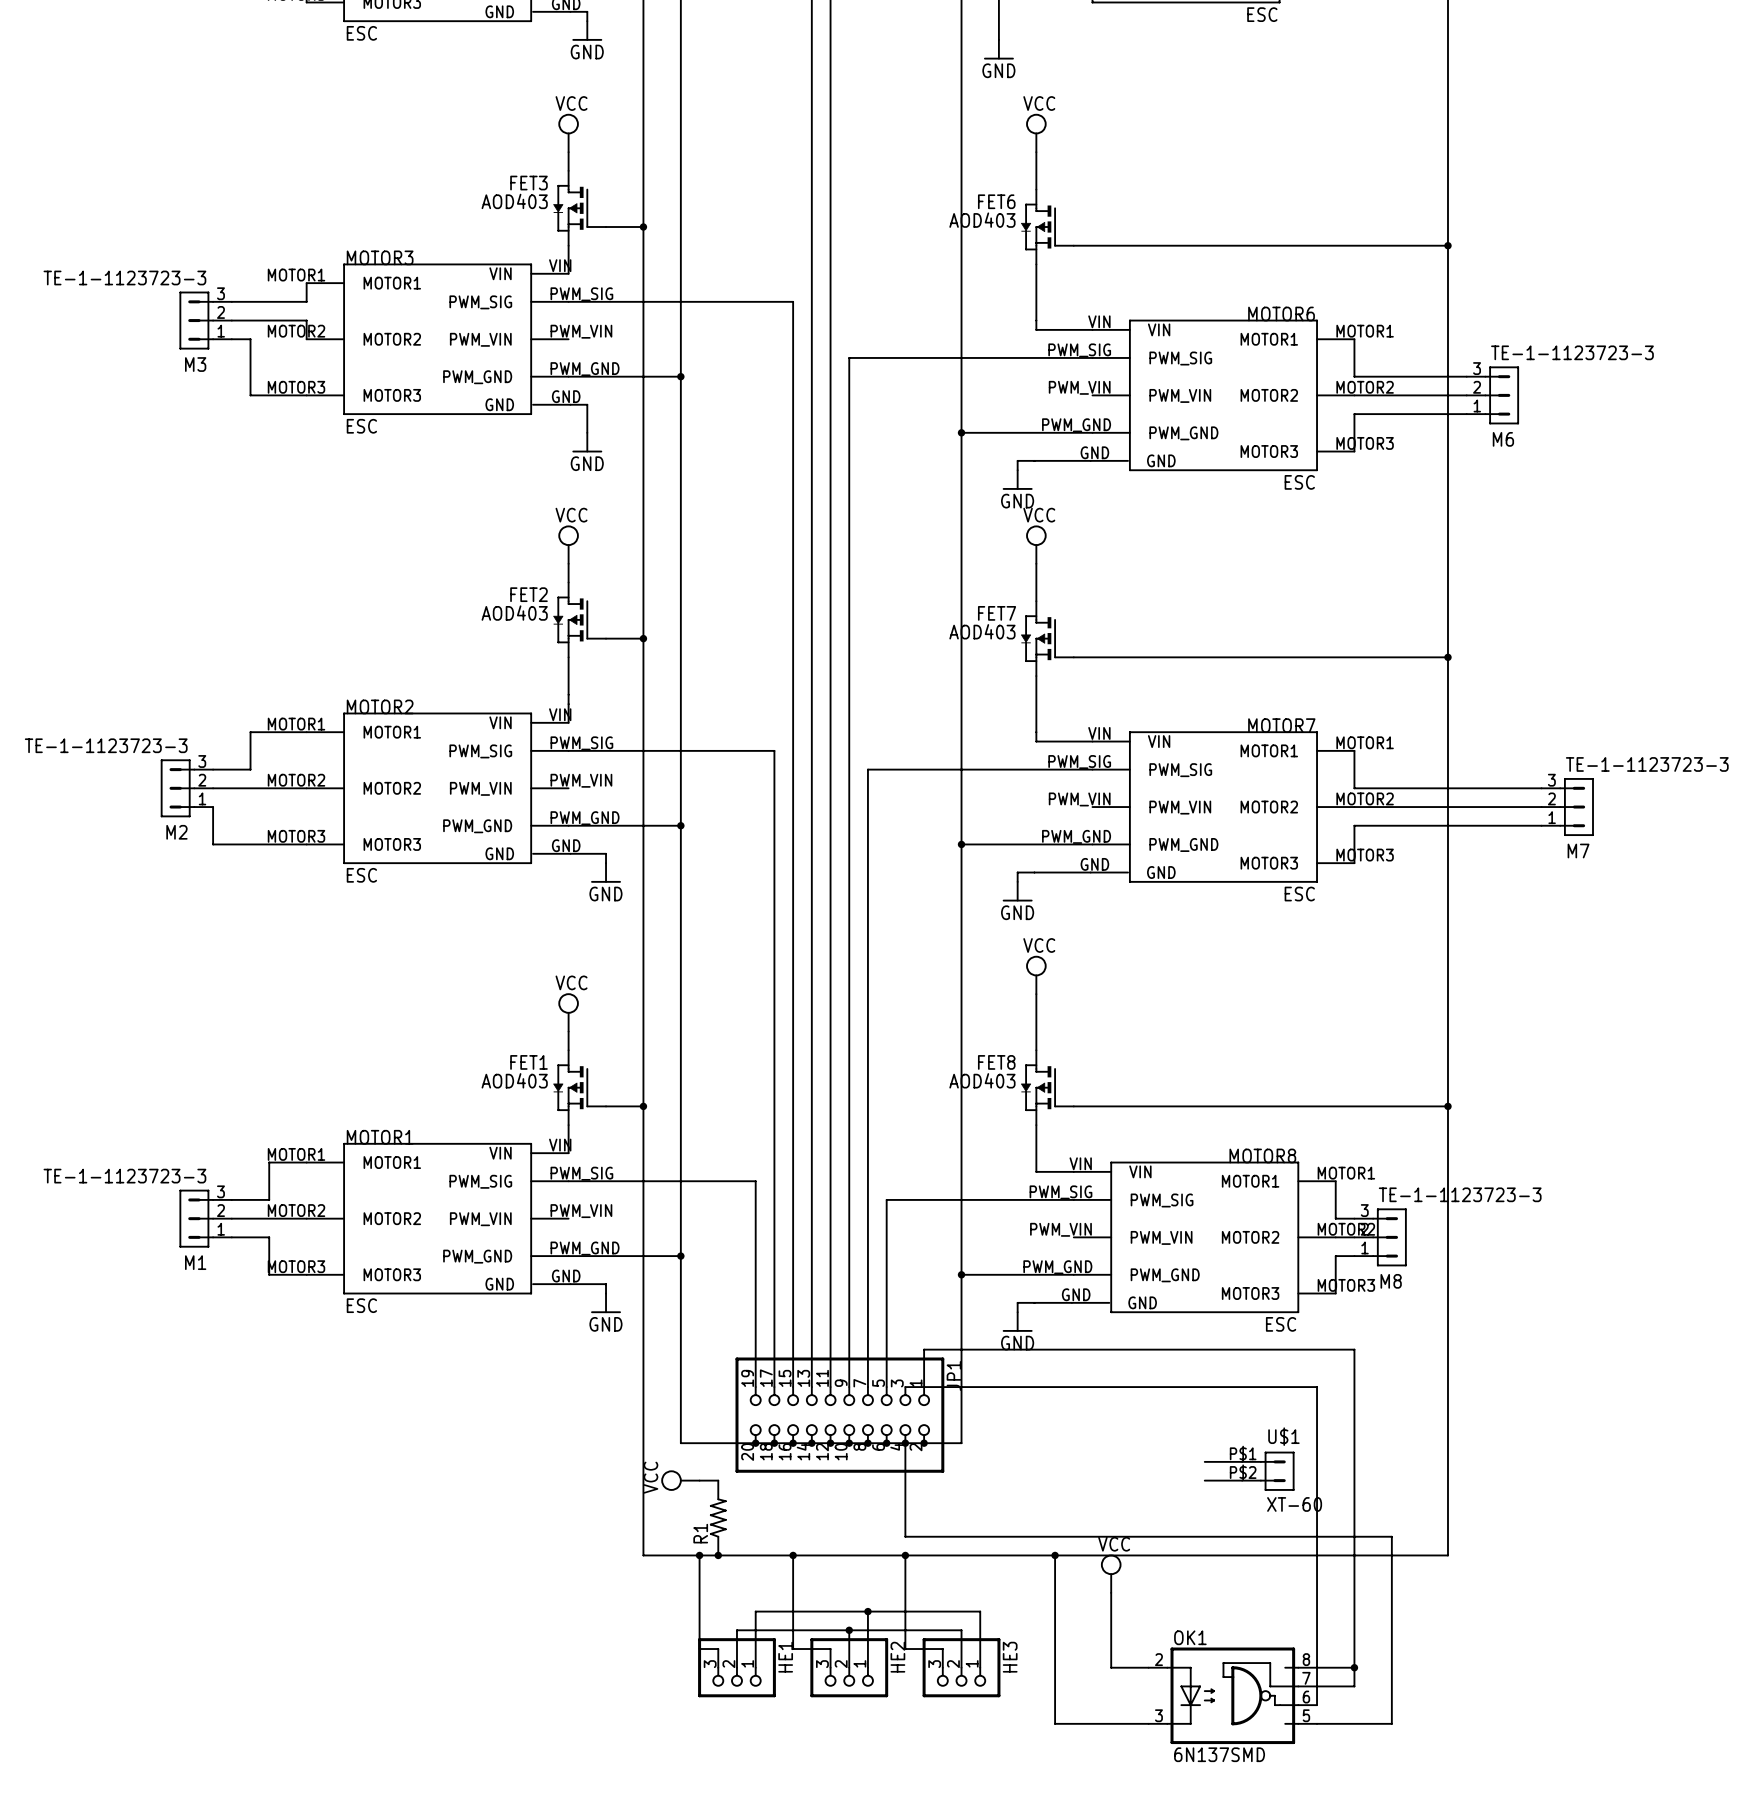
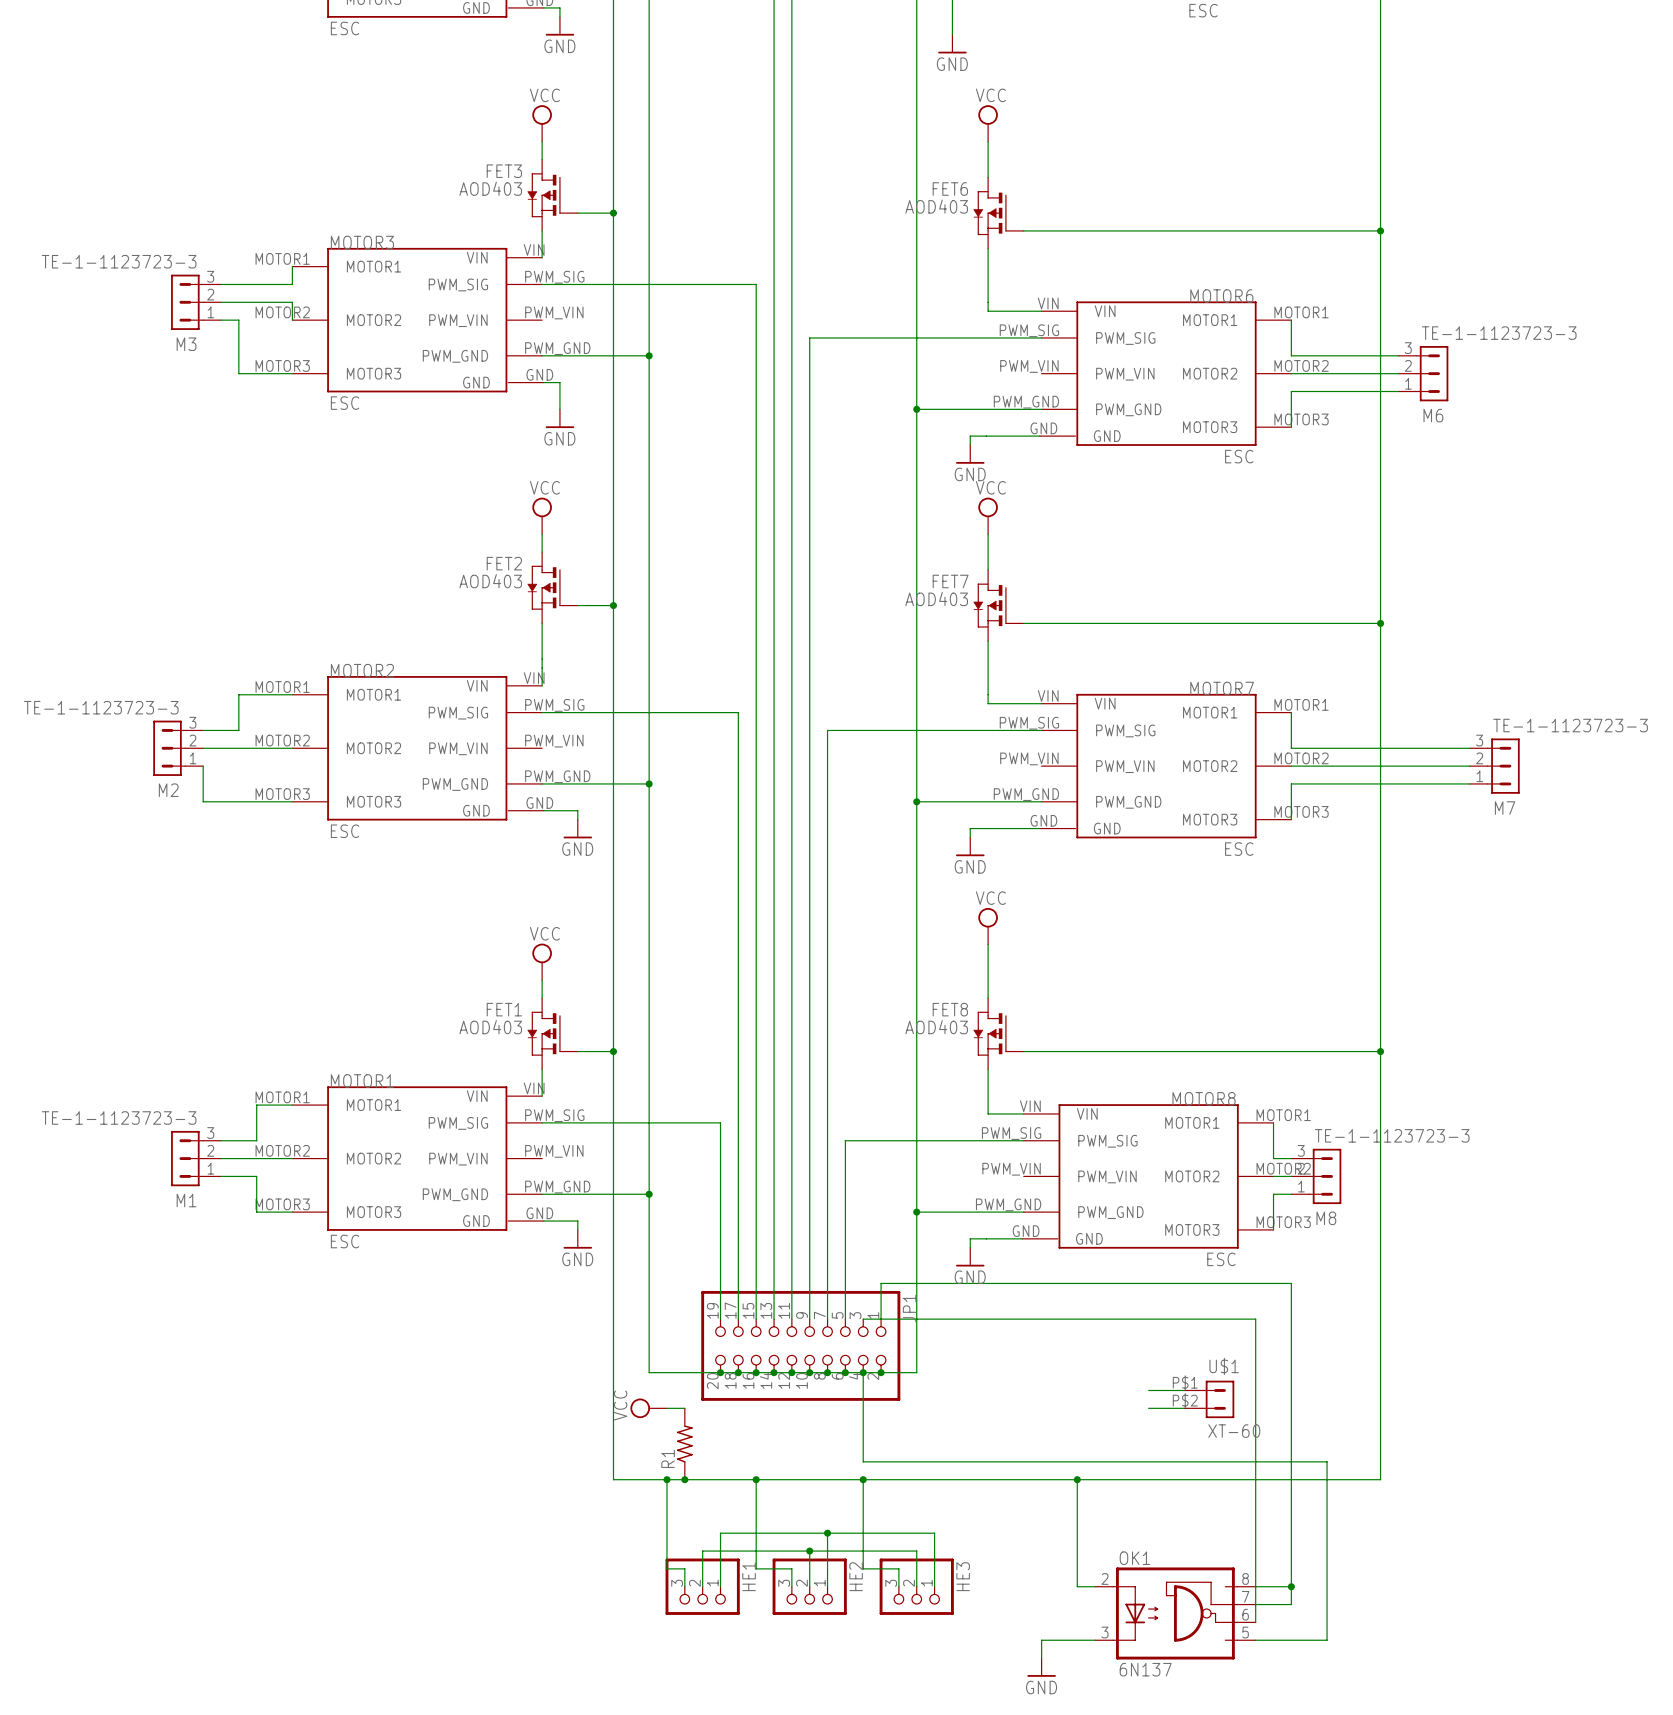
wire: (1055, 1555) (1055, 1723) (1092, 1723) -> (1041, 1658) (1041, 1640)
junction: (1055, 1555) -> none
junction: none -> (1077, 1479)
power symbol: VCC (1111, 1573) -> none
wire: (1111, 1592) (1111, 1667) (1129, 1667) -> (1077, 1479) (1077, 1586)
power symbol: none -> GND (1041, 1667)
OK1 value: 6N137SMD (1219, 1754) -> 6N137 (1145, 1669)

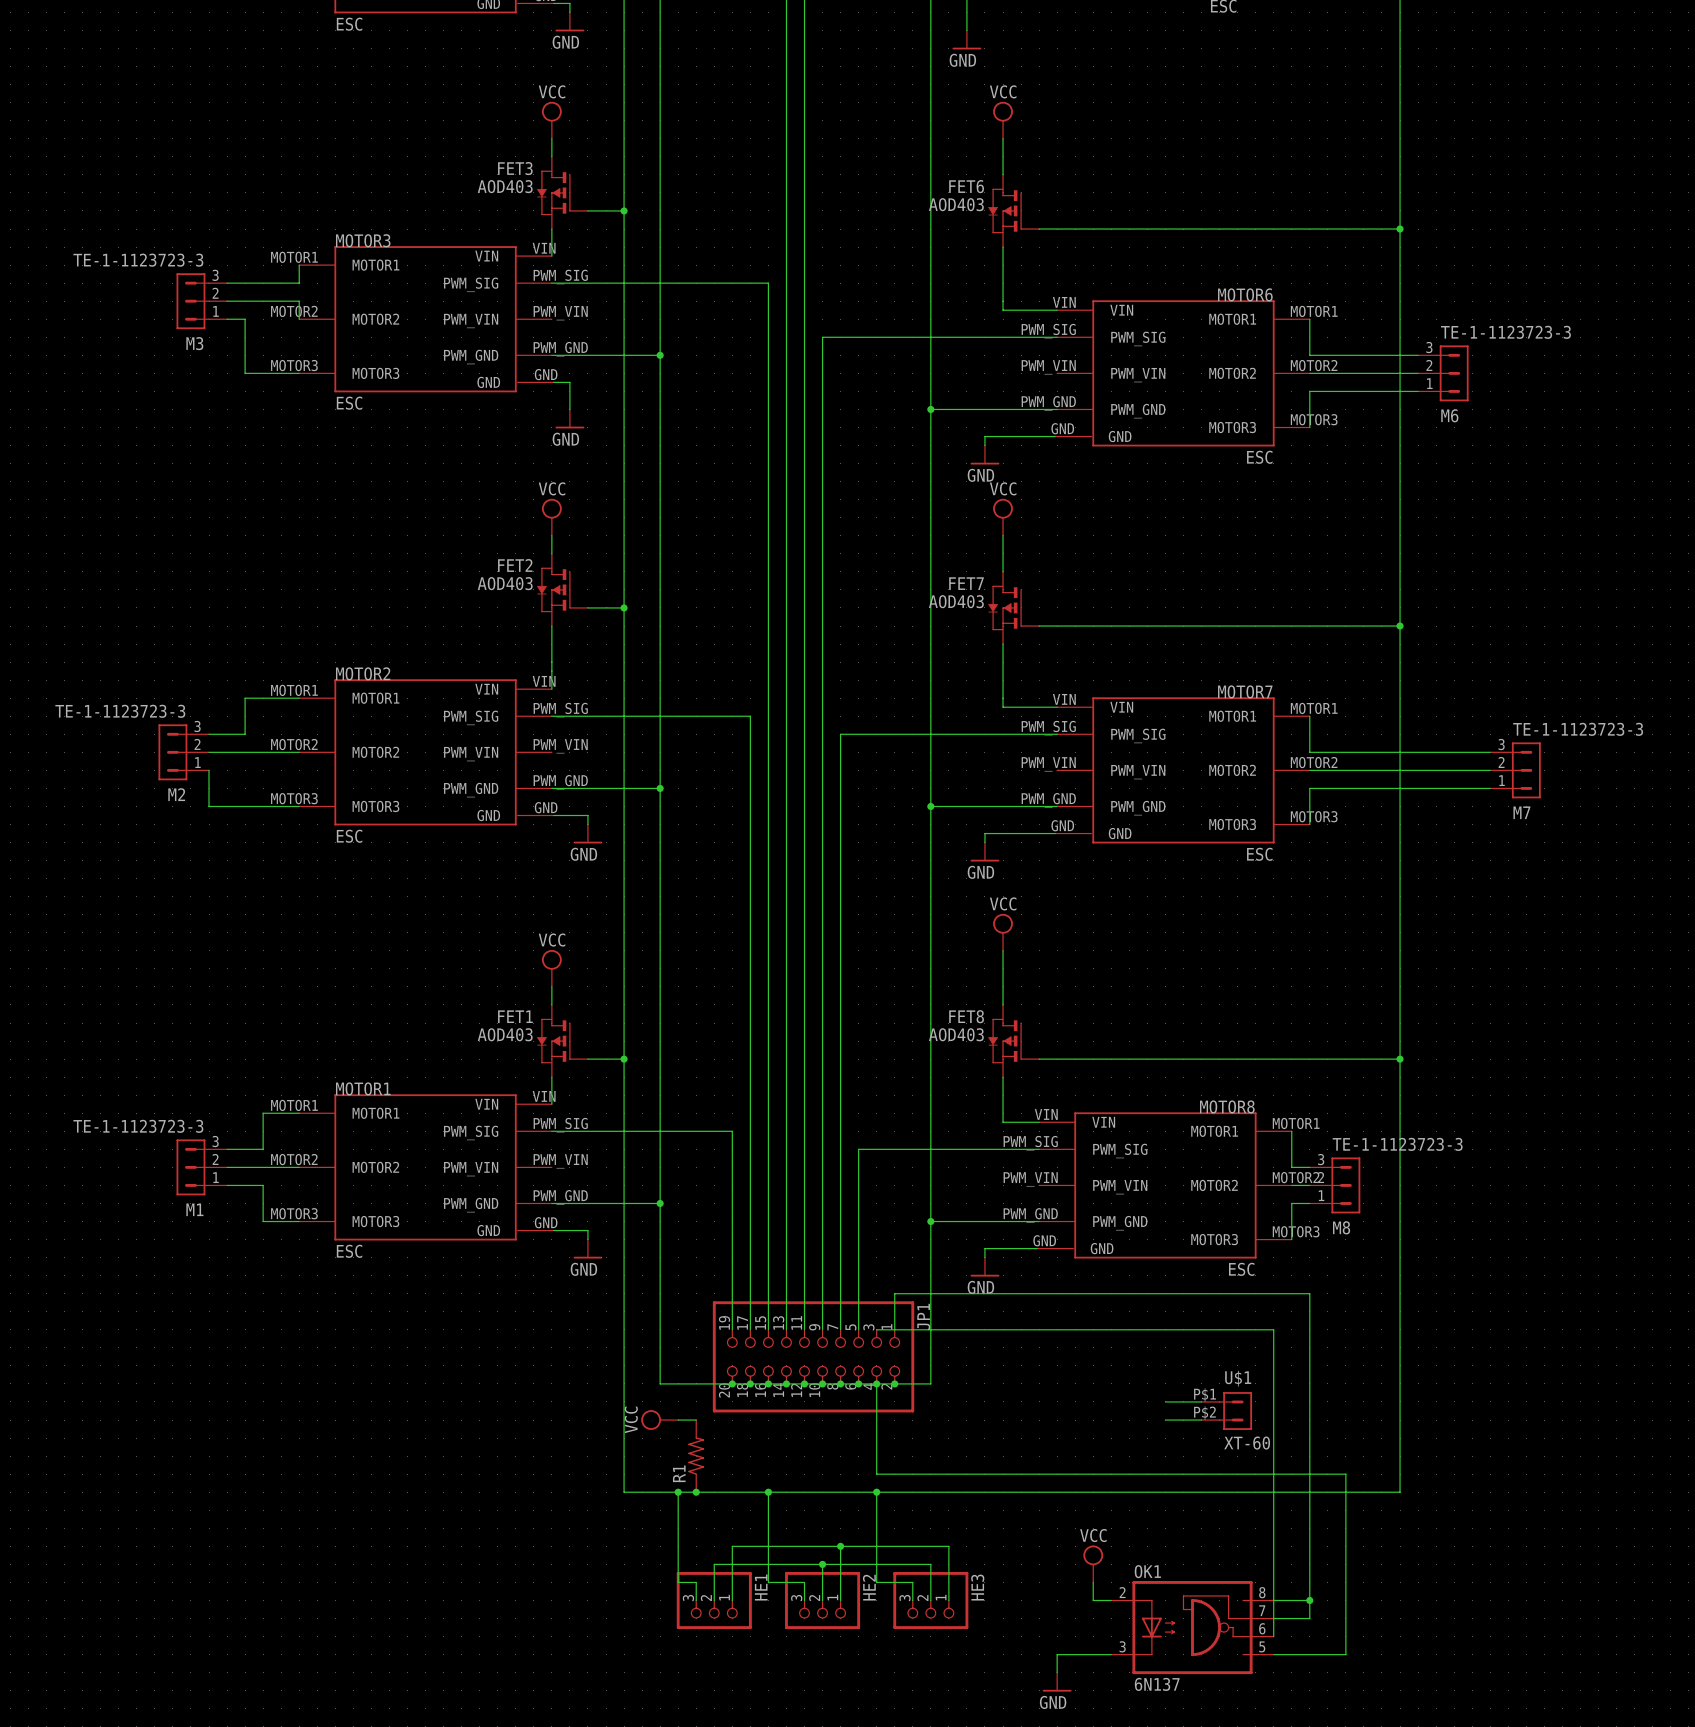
wire: (1077, 1479) (1077, 1568) -> none
junction: (1077, 1479) -> none
power symbol: none -> VCC (1093, 1563)

